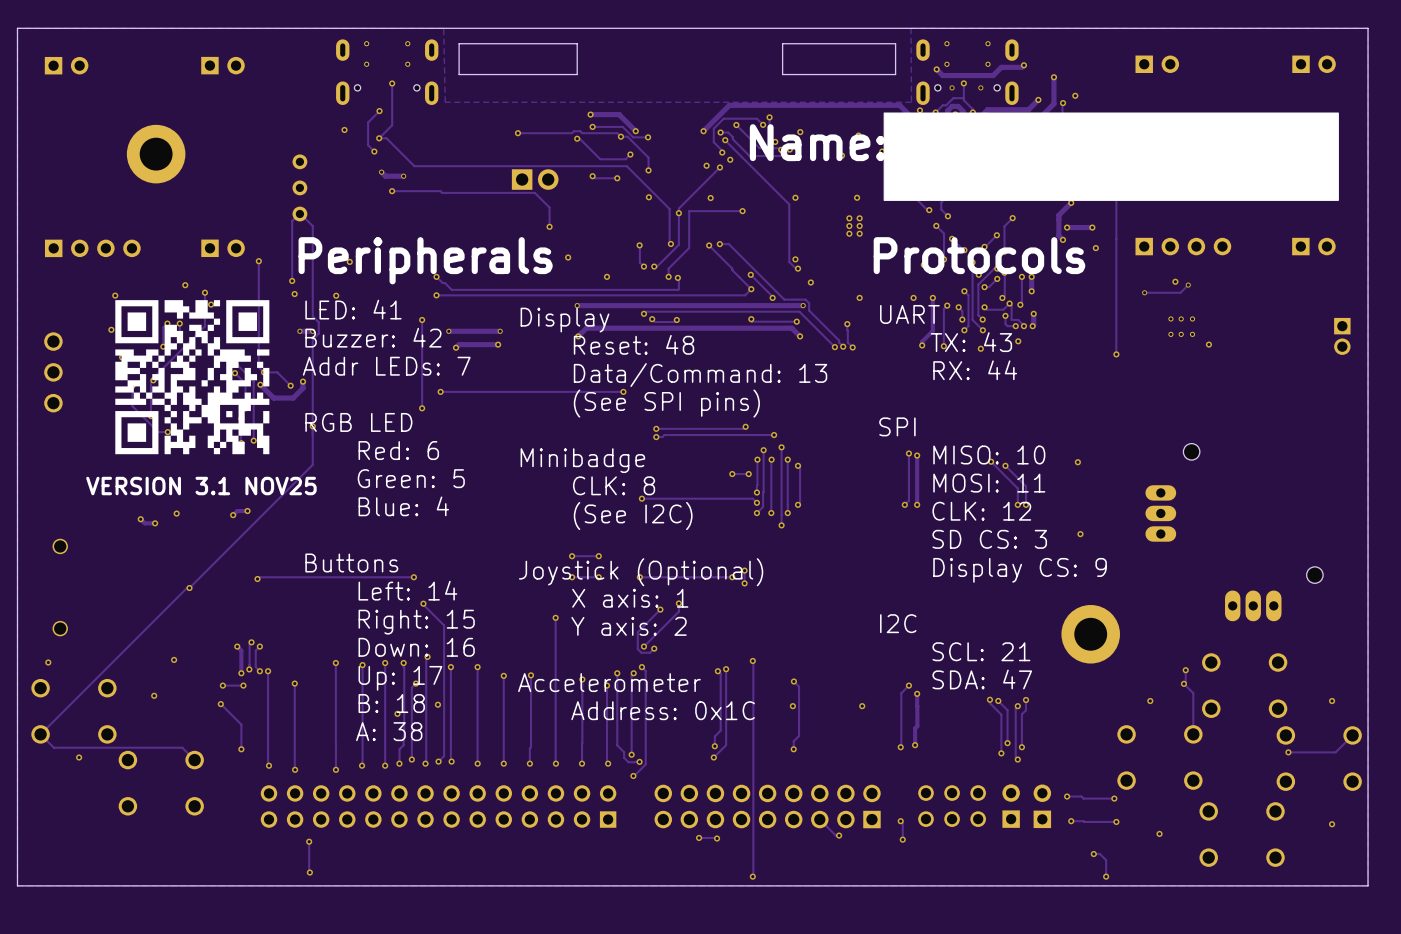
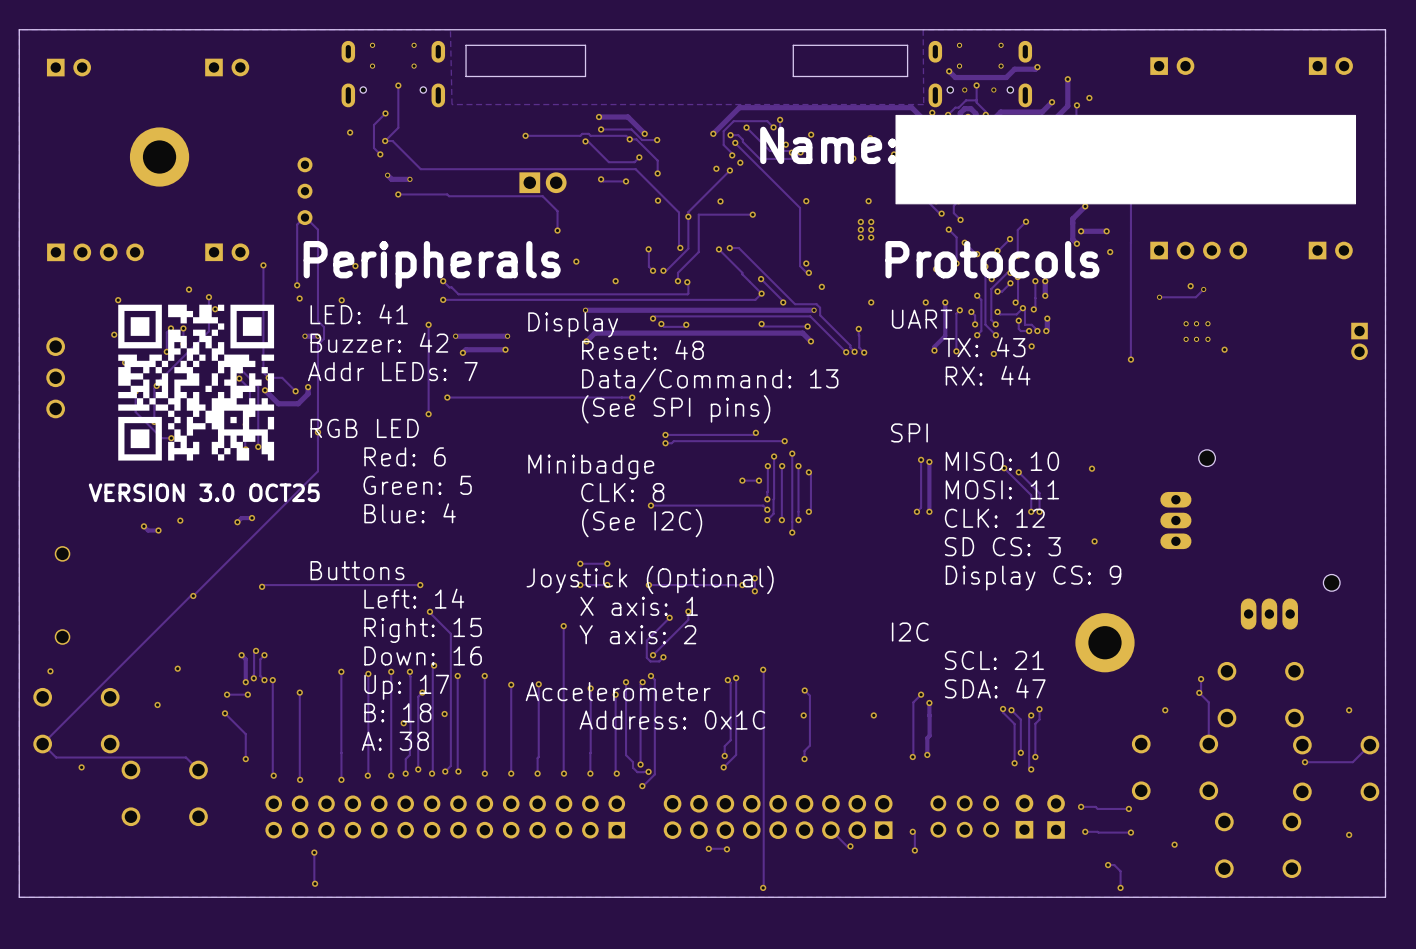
text: VERSION 3.1 NOV25 (201, 486) -> VERSION 3.0 OCT25 (204, 492)

